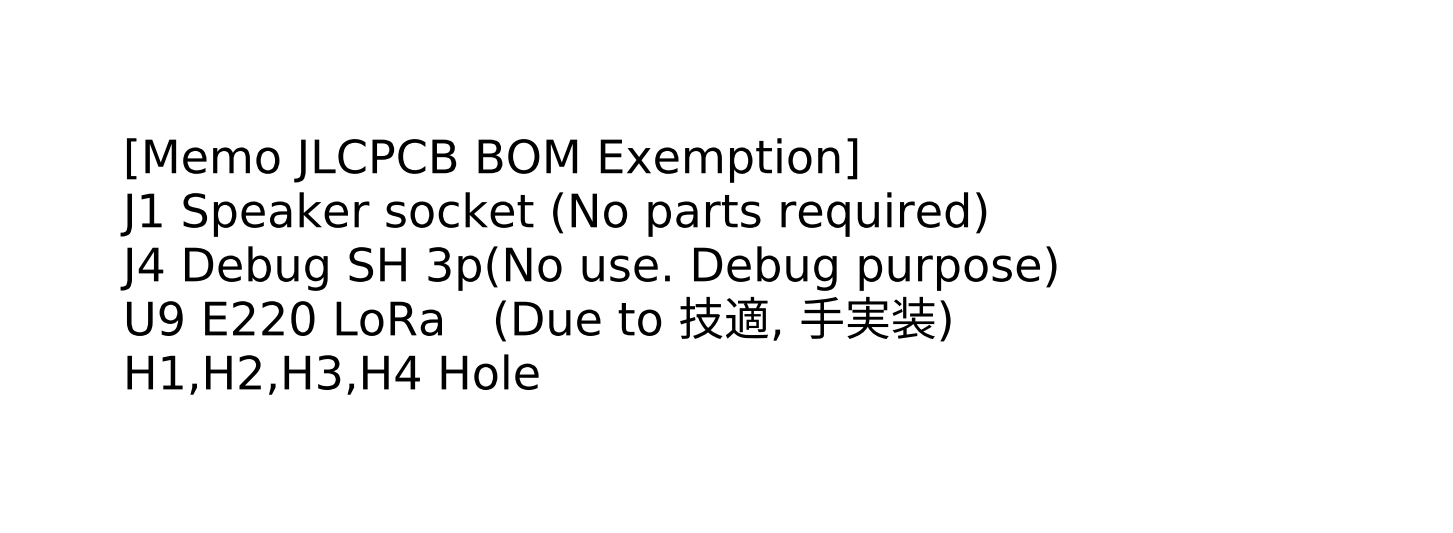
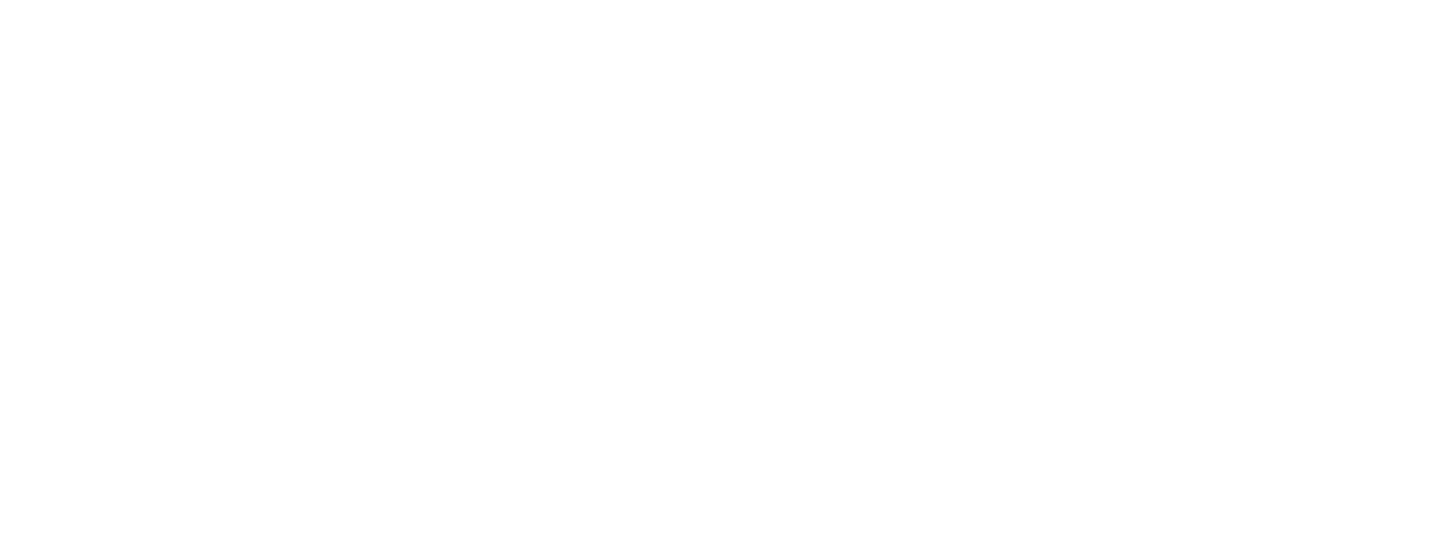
text: [Memo JLCPCB BOM Exemption] (492, 160) -> none
text: J1 Speaker socket (No parts required) (553, 214) -> none
text: J4 Debug SH 3p(No use. Debug purpose) (588, 268) -> none
text: U9 E220 LoRa (Due to 技適, 手実装) (538, 319) -> none
text: H1,H2,H3,H4 Hole (333, 374) -> none

